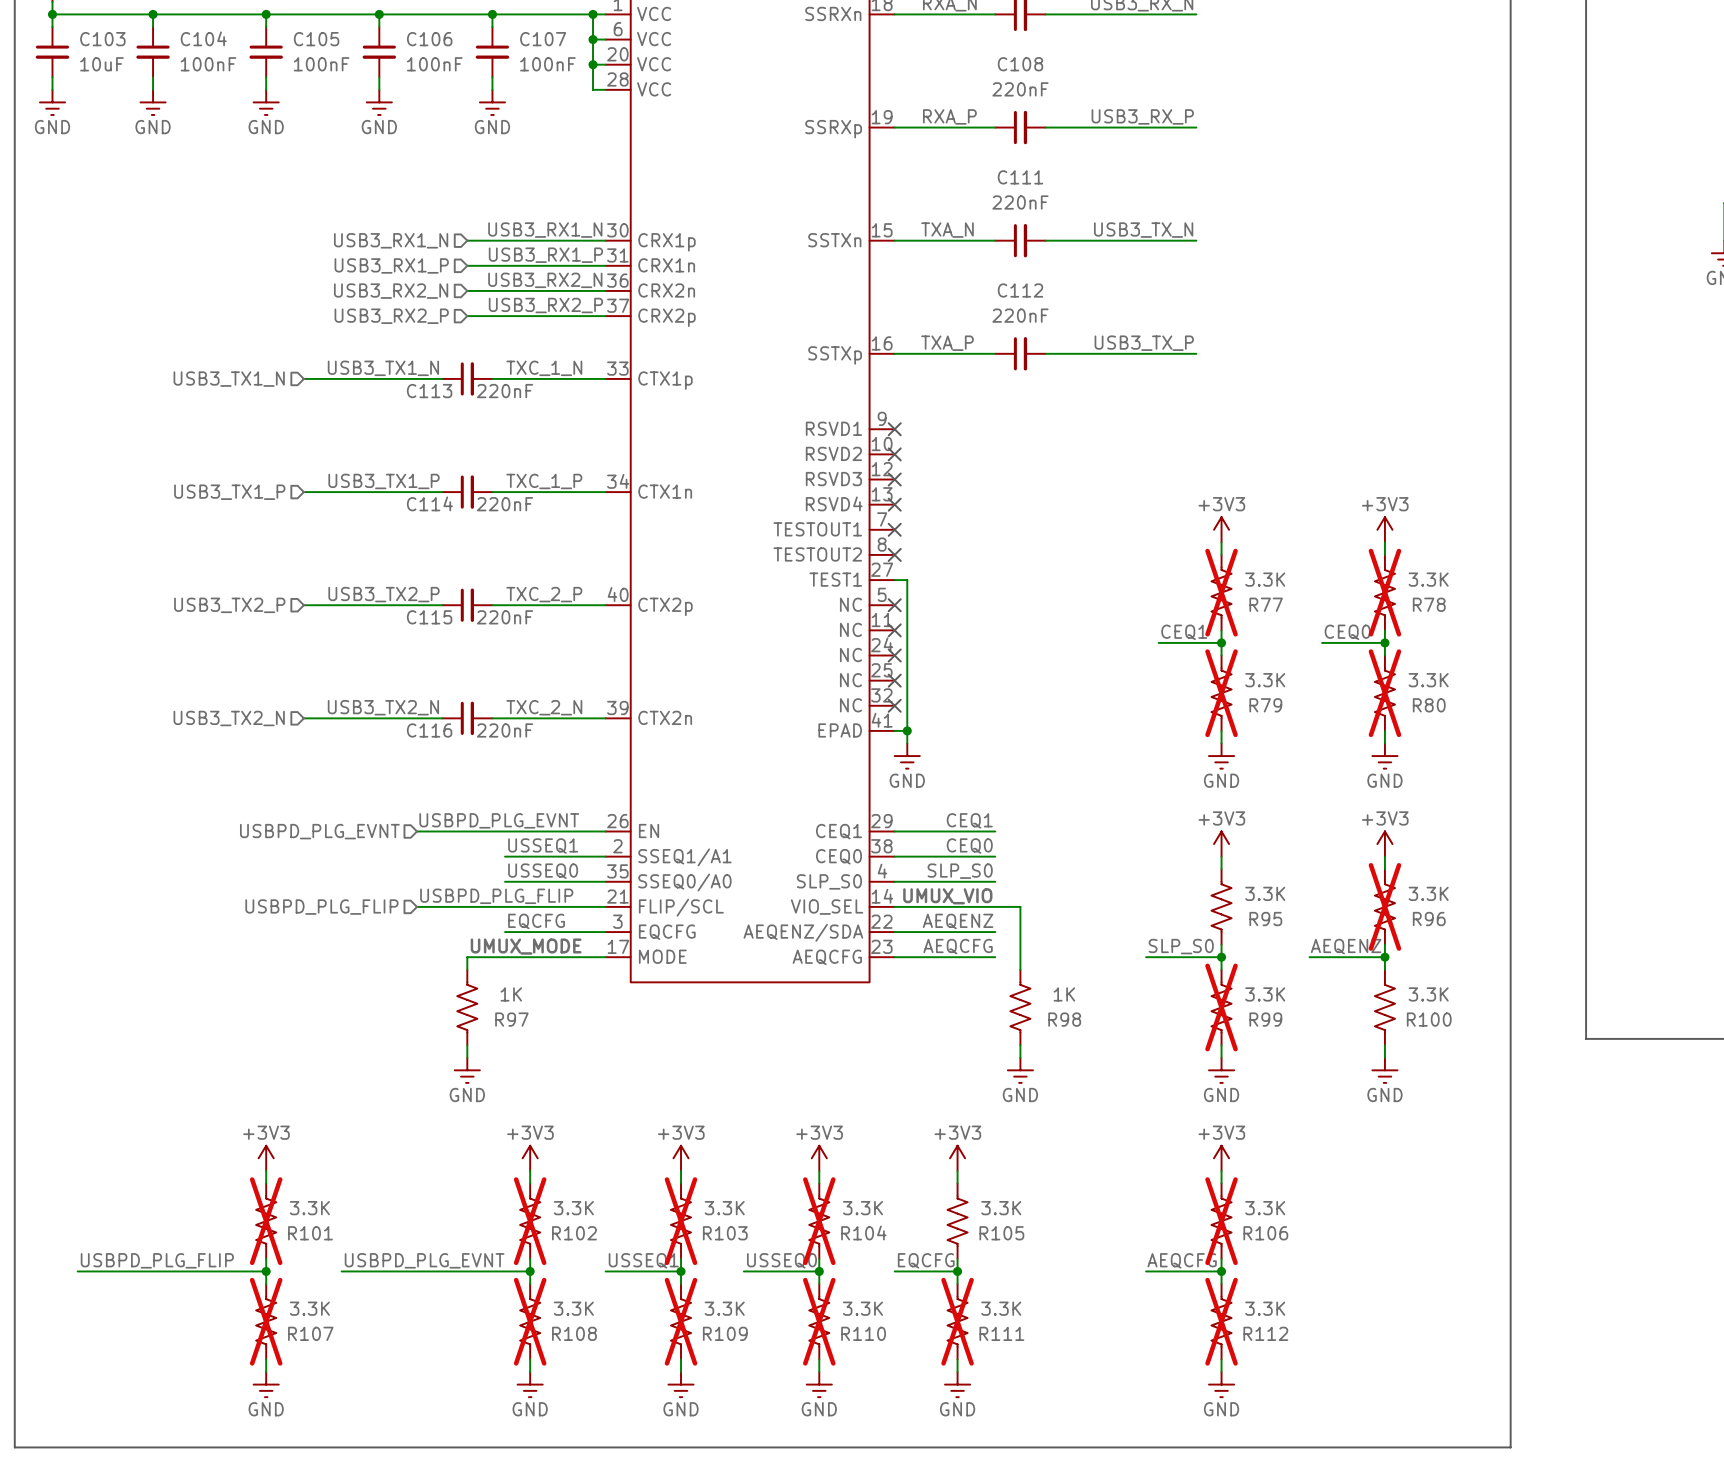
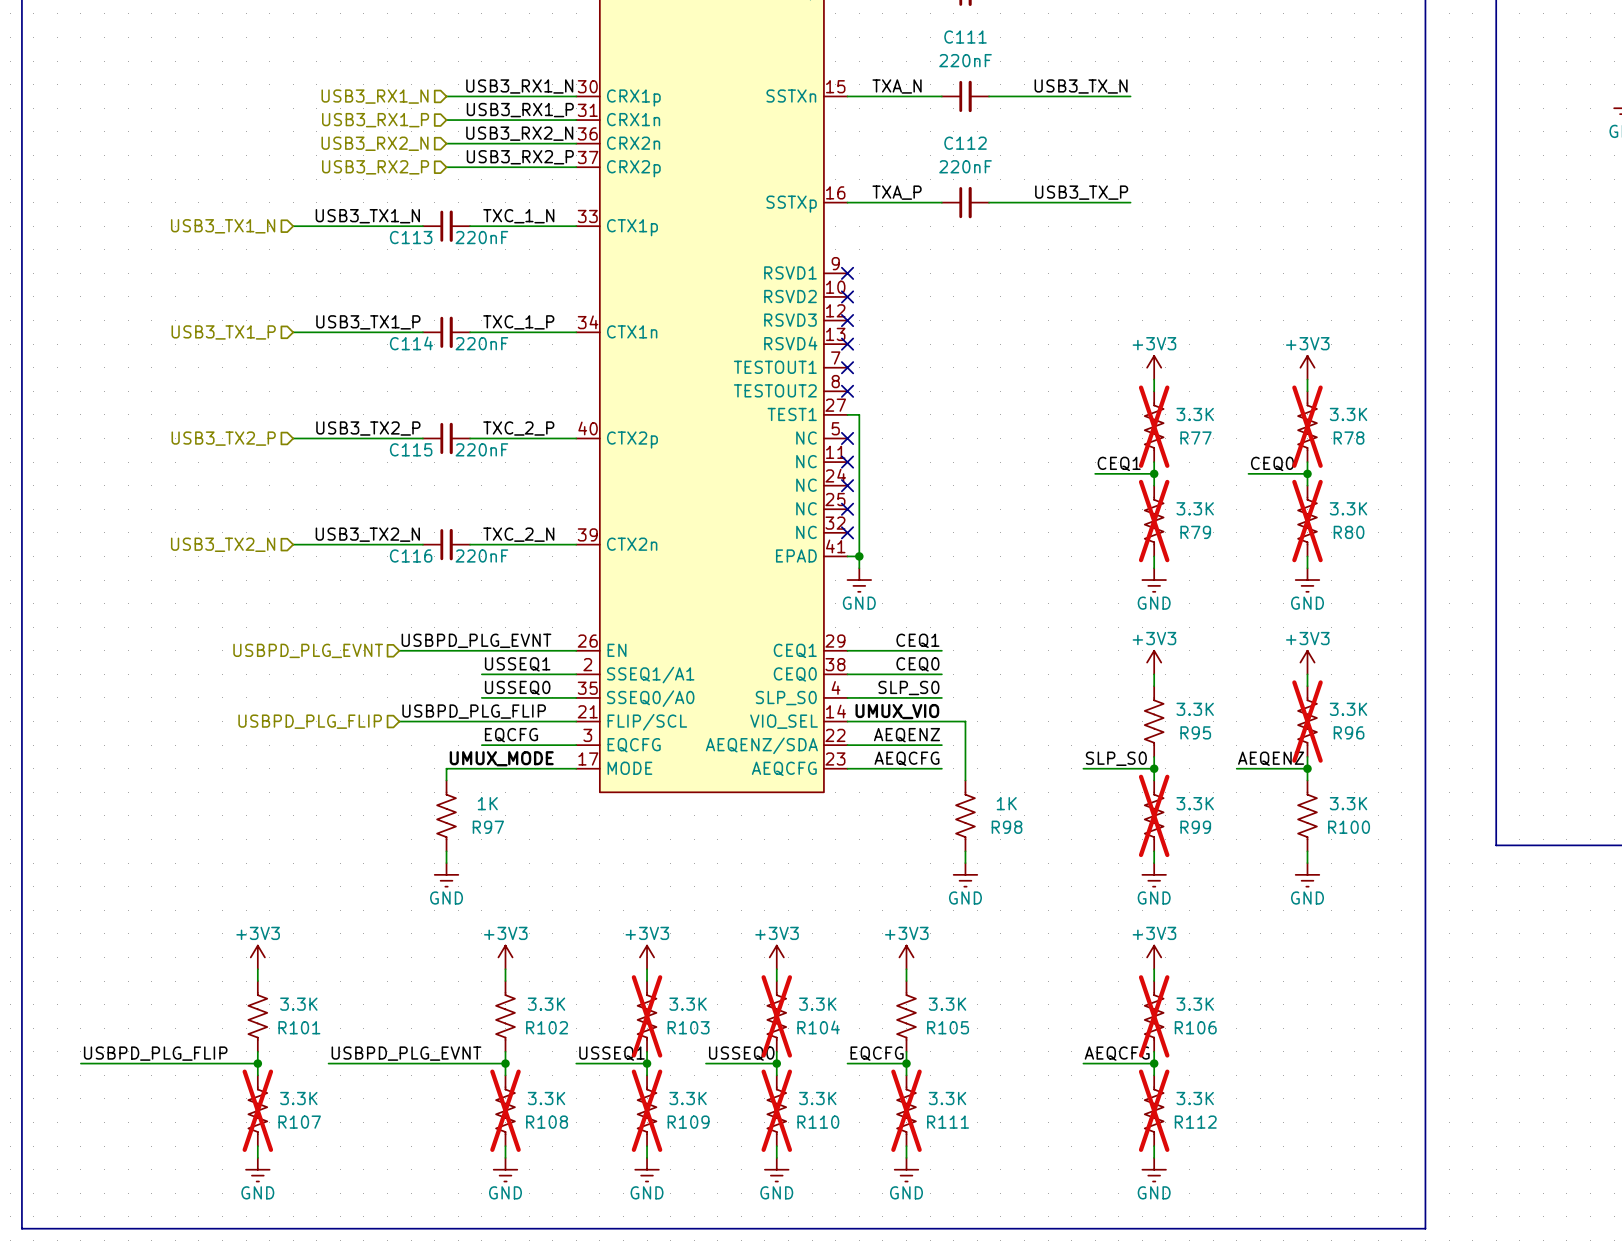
R101 do-not-place cross: (266, 1221) -> none
R102 do-not-place cross: (530, 1221) -> none

